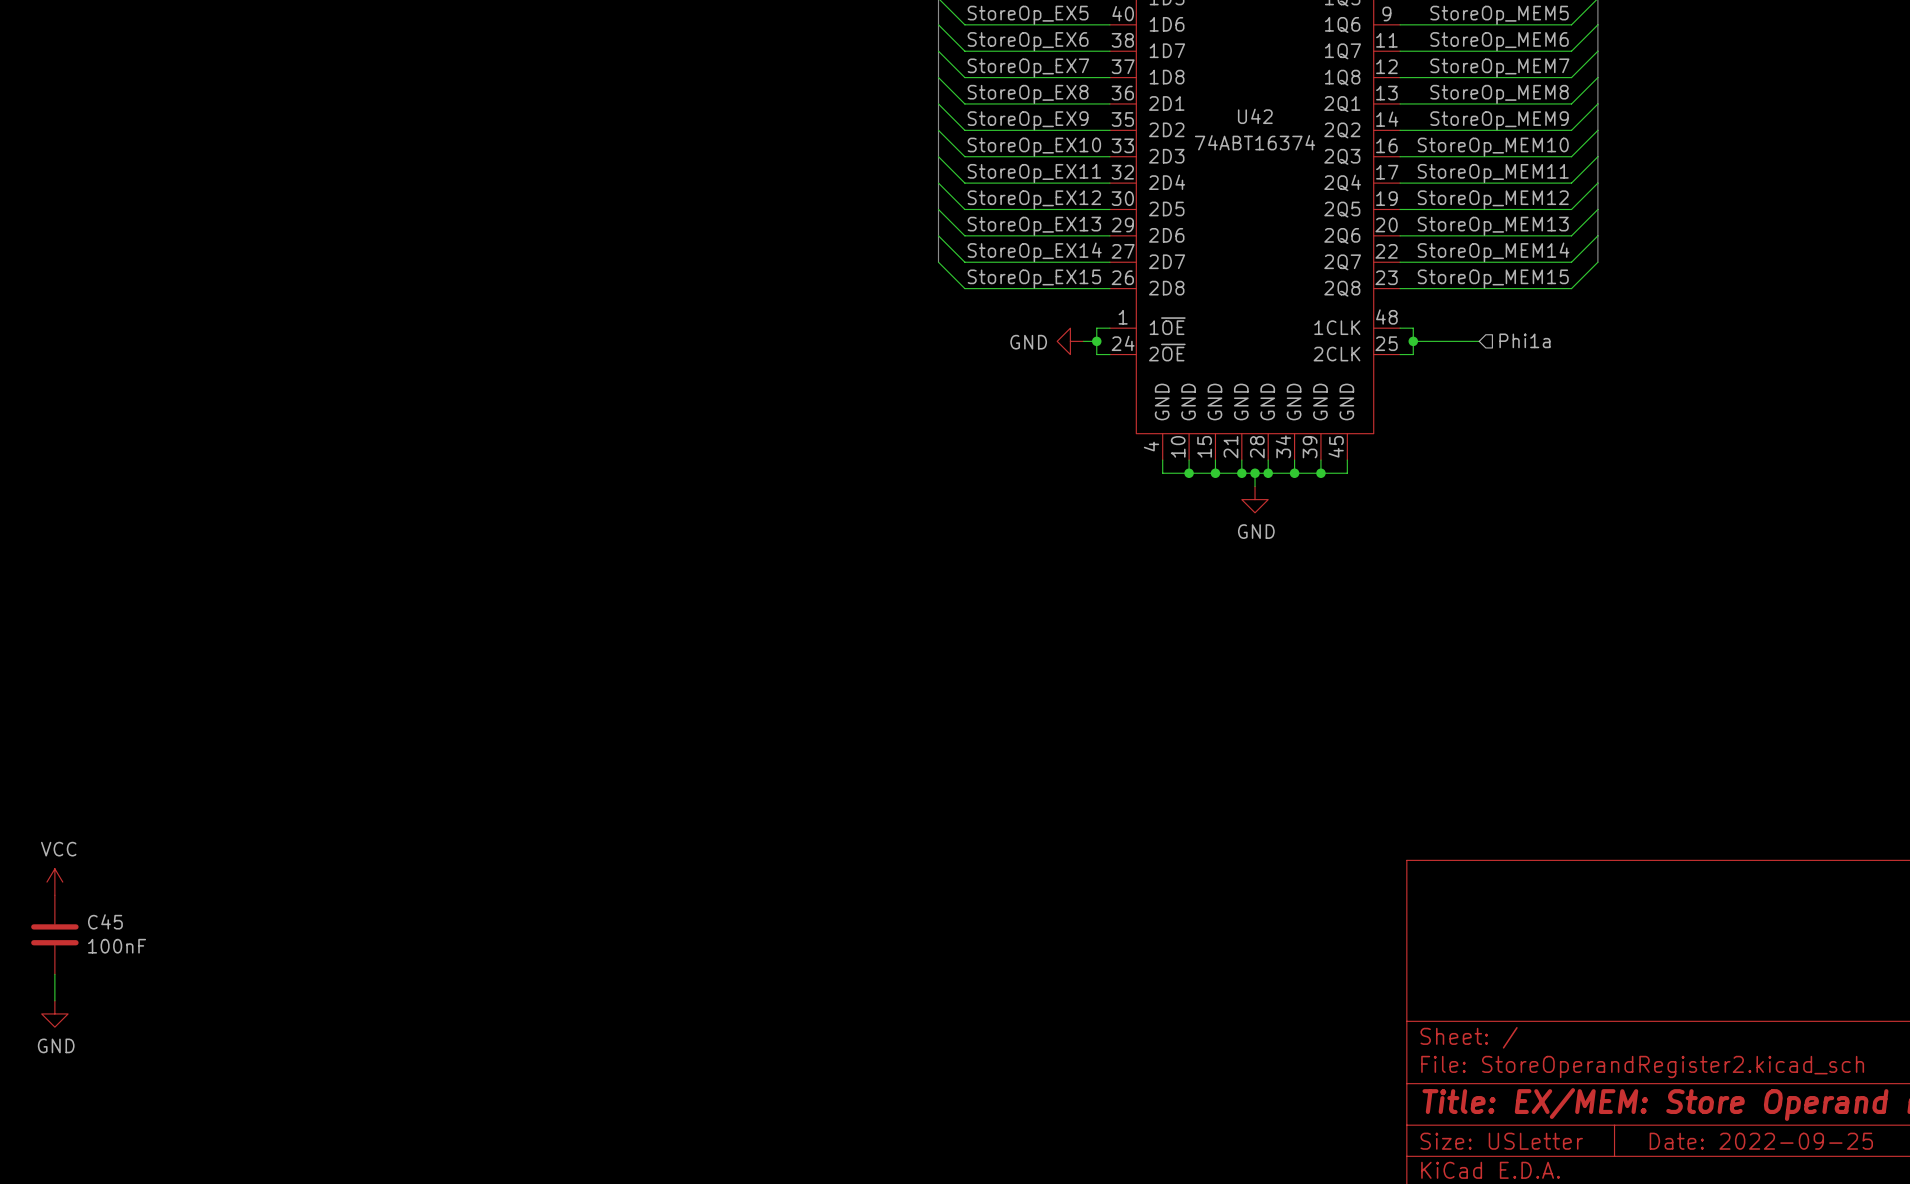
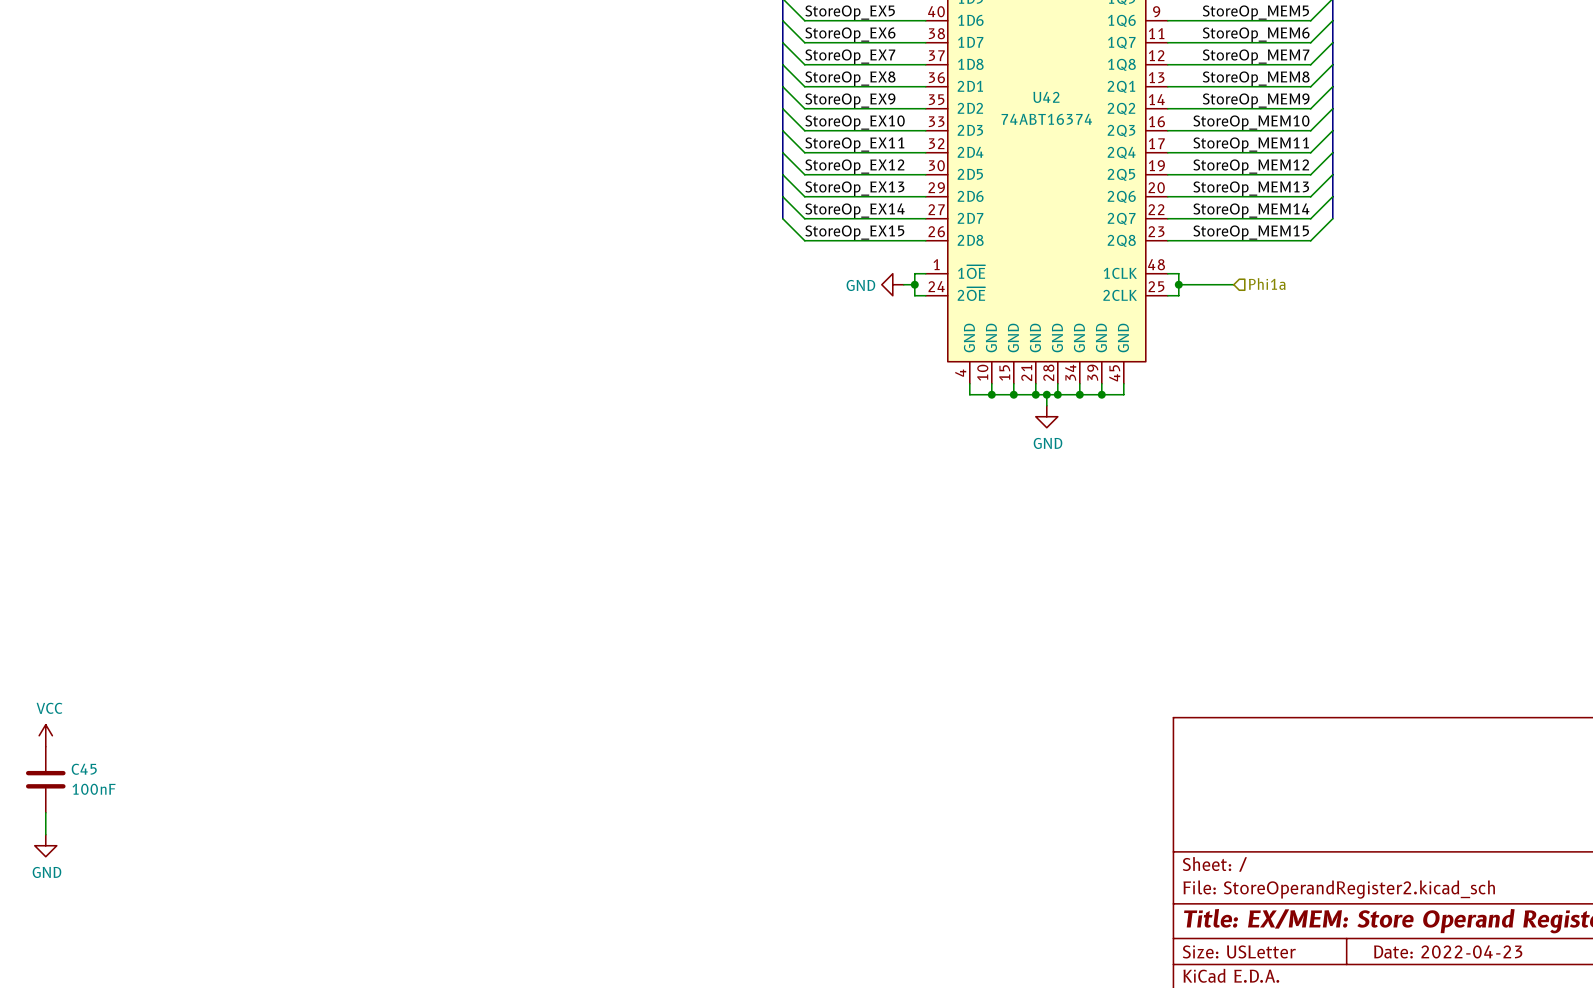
title block: Date: 2022-09-25 (1761, 1141) -> Date: 2022-04-23 (1448, 951)

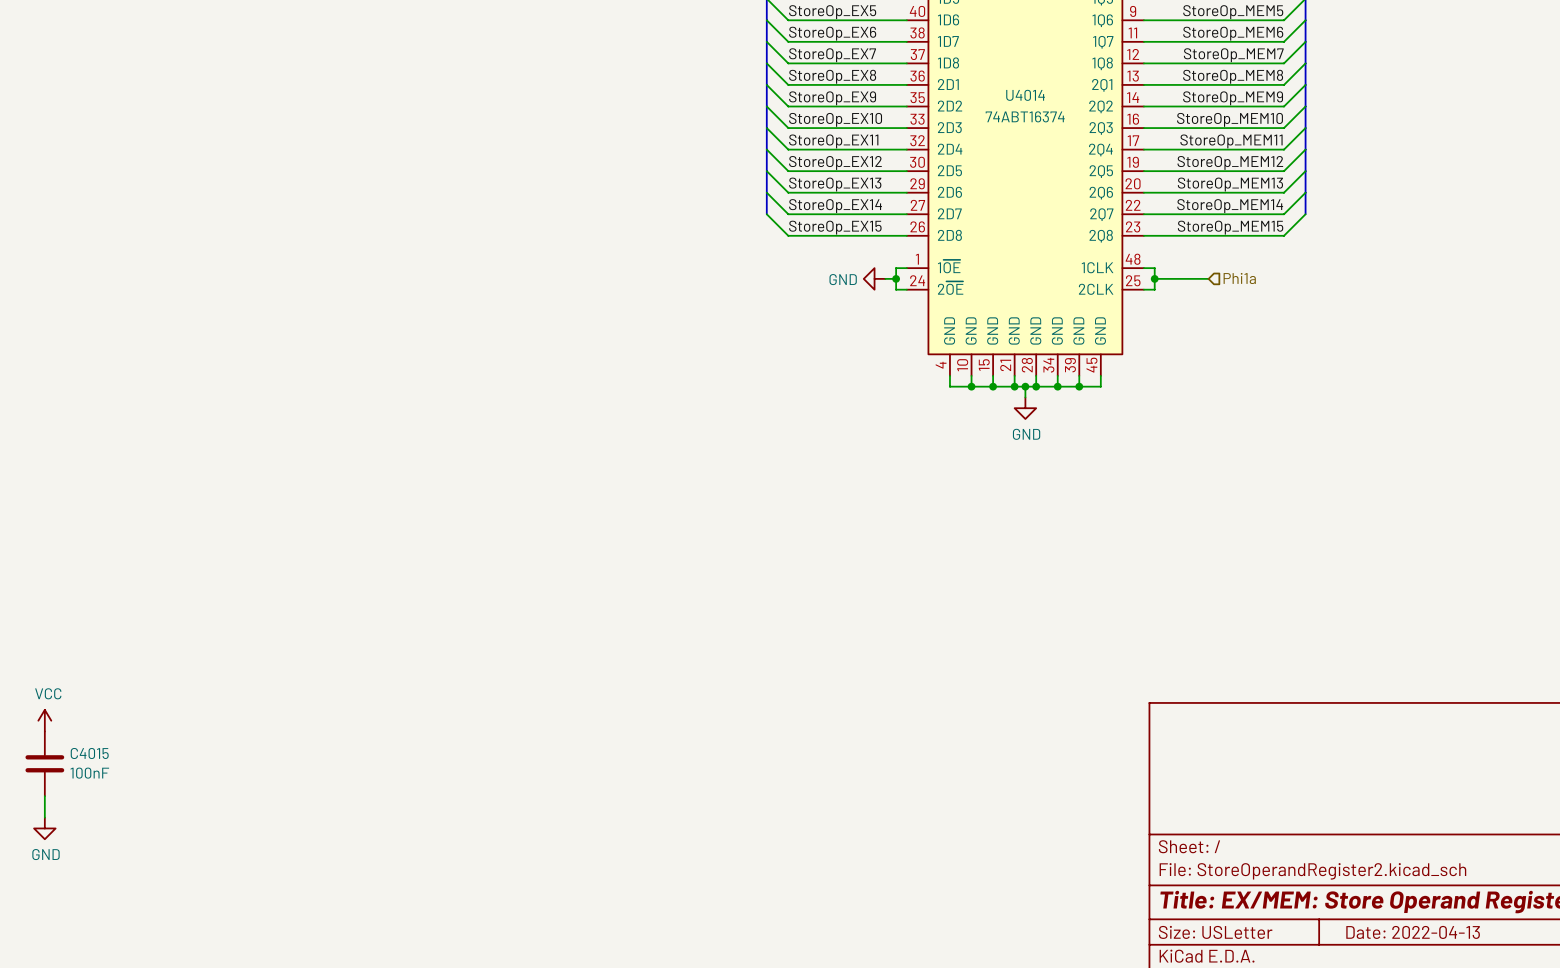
U42 name: U42 (1046, 97) -> U4014 (1025, 95)
C45 name: C45 (84, 769) -> C4015 (89, 753)
title block: Date: 2022-04-23 (1448, 951) -> Date: 2022-04-13 (1413, 932)

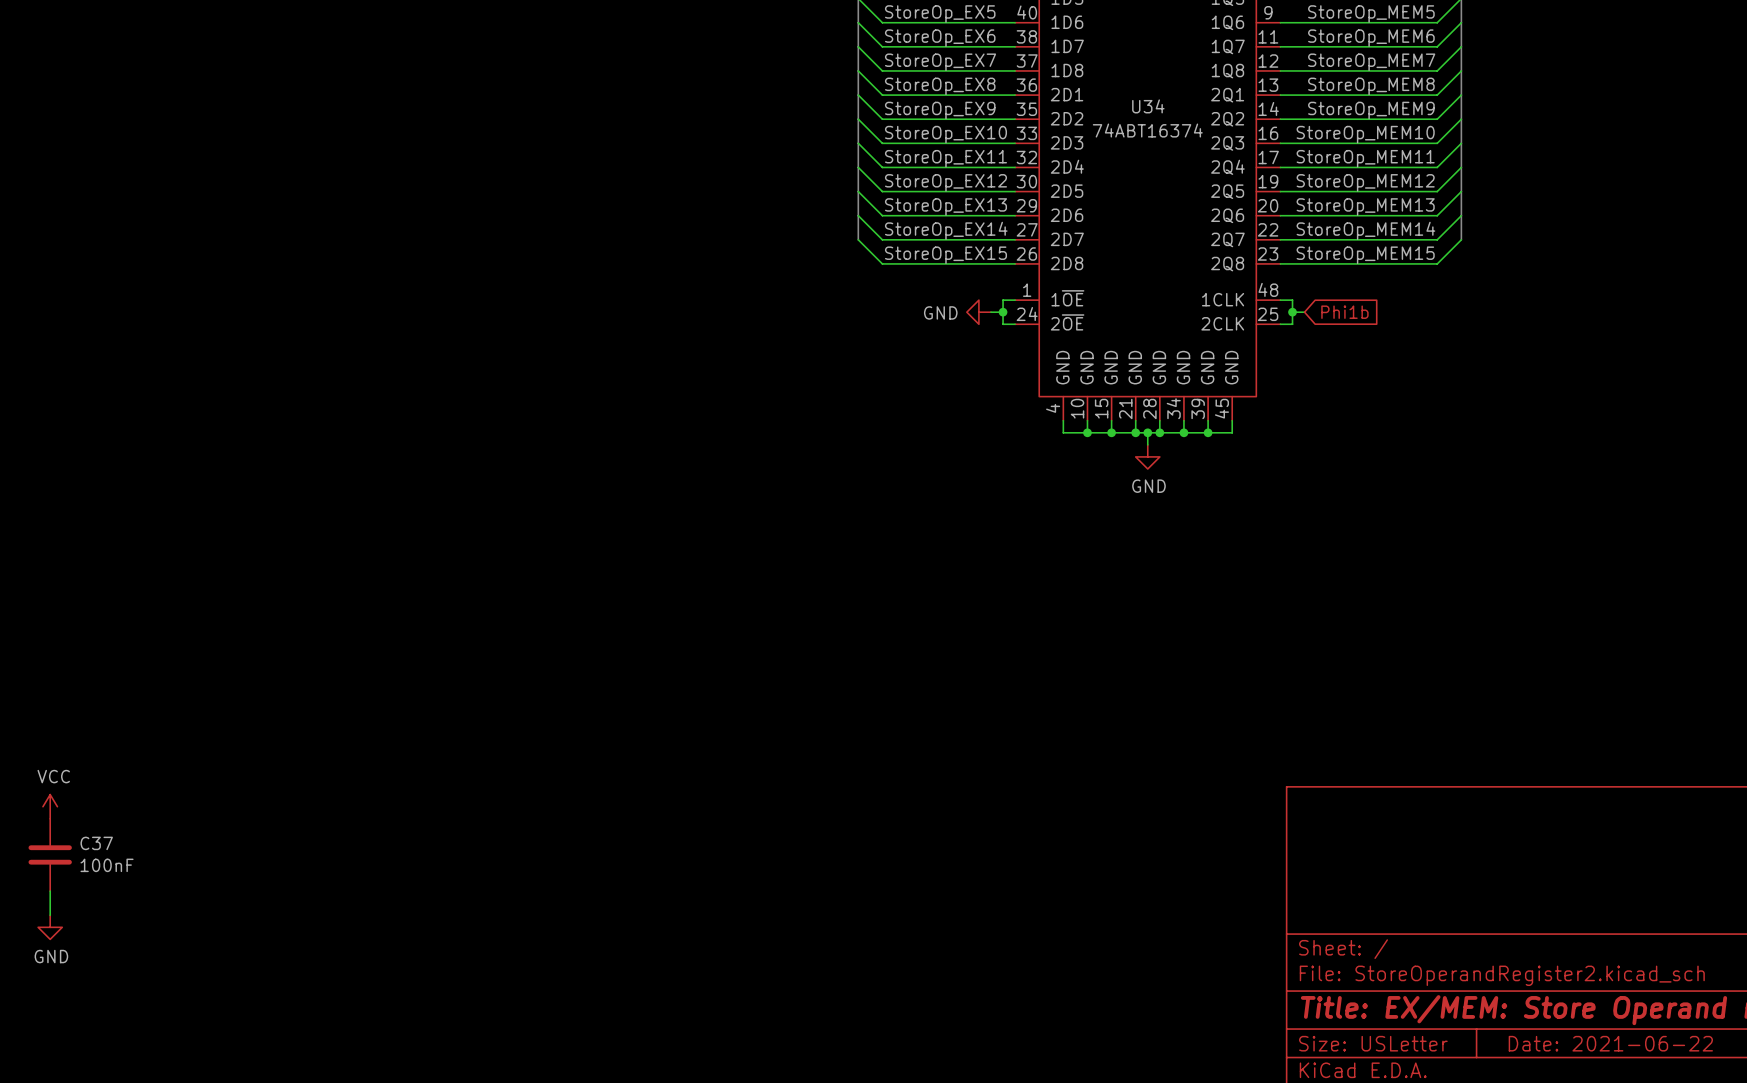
U4014 name: U4014 (1025, 95) -> U34 (1148, 106)
wire: (1165, 278) (1208, 278) -> none
global label: none -> Phi1b (1344, 312)
hierarchical label: Phi1a (1239, 278) -> none
C4015 name: C4015 (89, 753) -> C37 (96, 843)
title block: Date: 2022-04-13 (1413, 932) -> Date: 2021-06-22 (1610, 1043)

